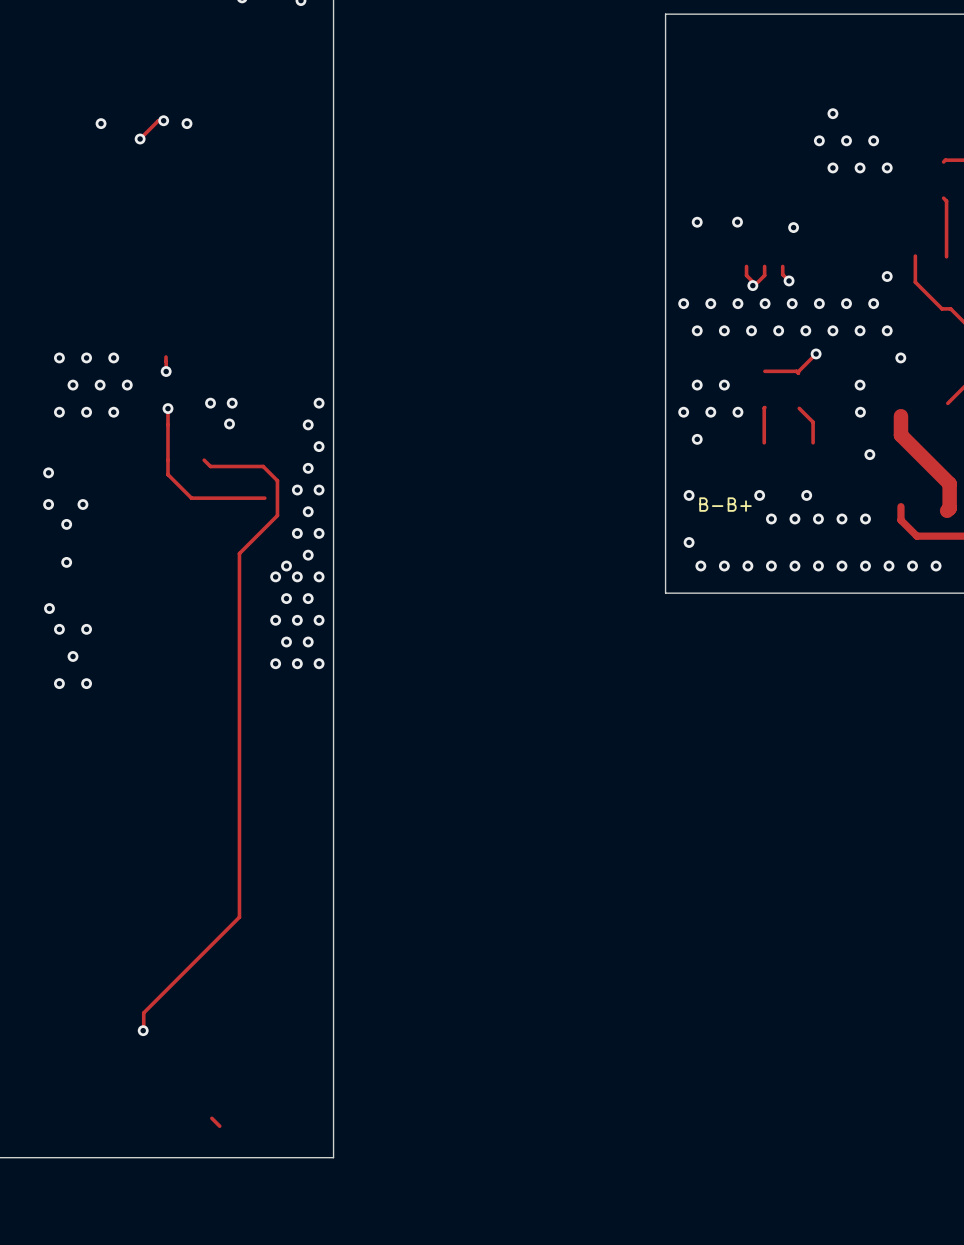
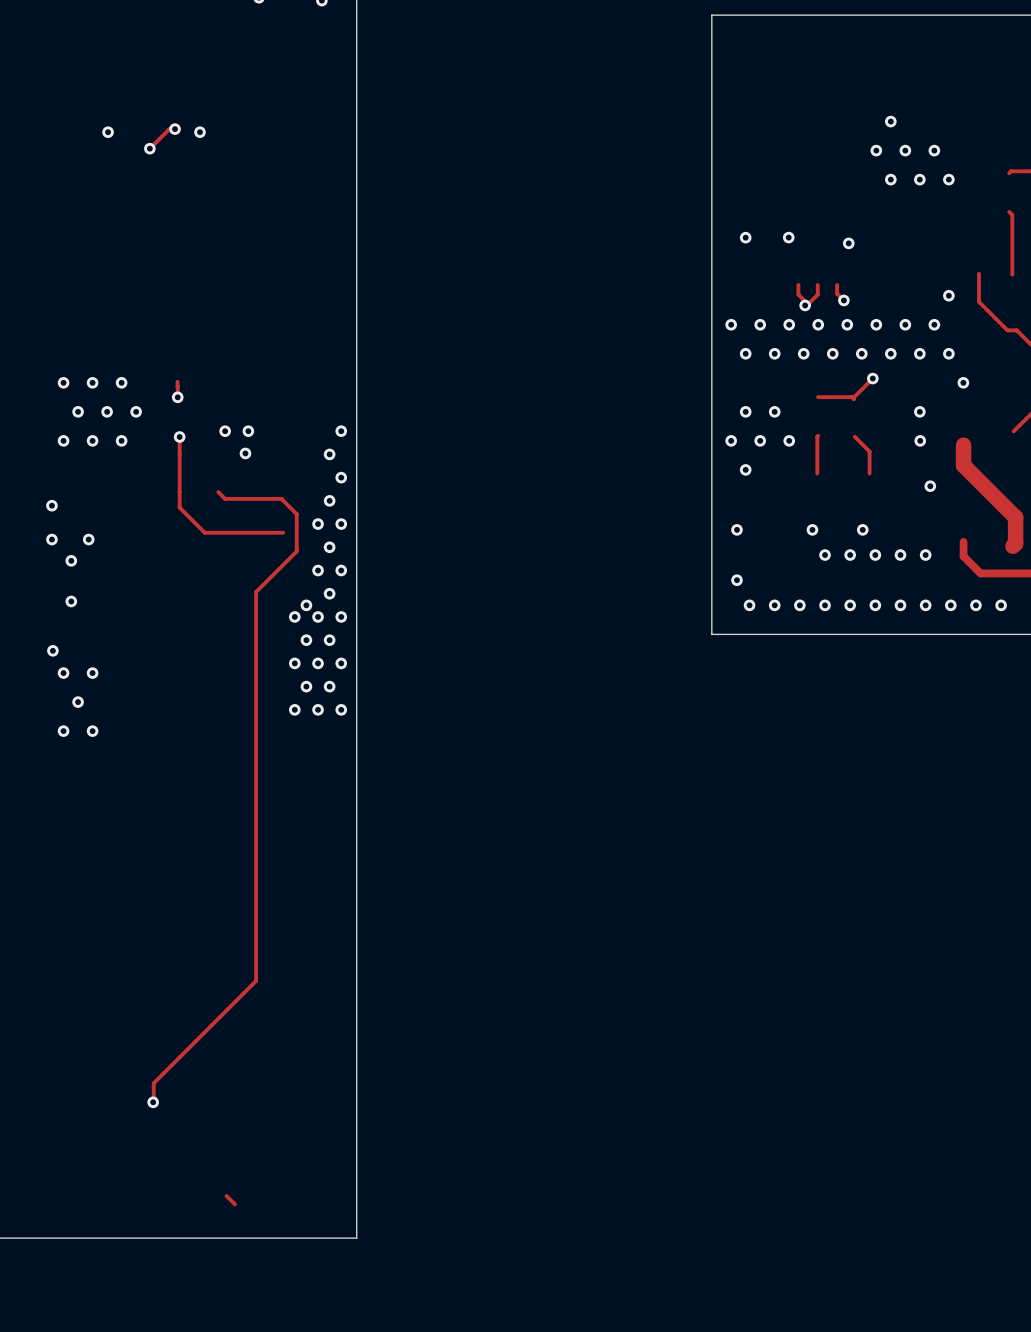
text: B-B+ (725, 504) -> none

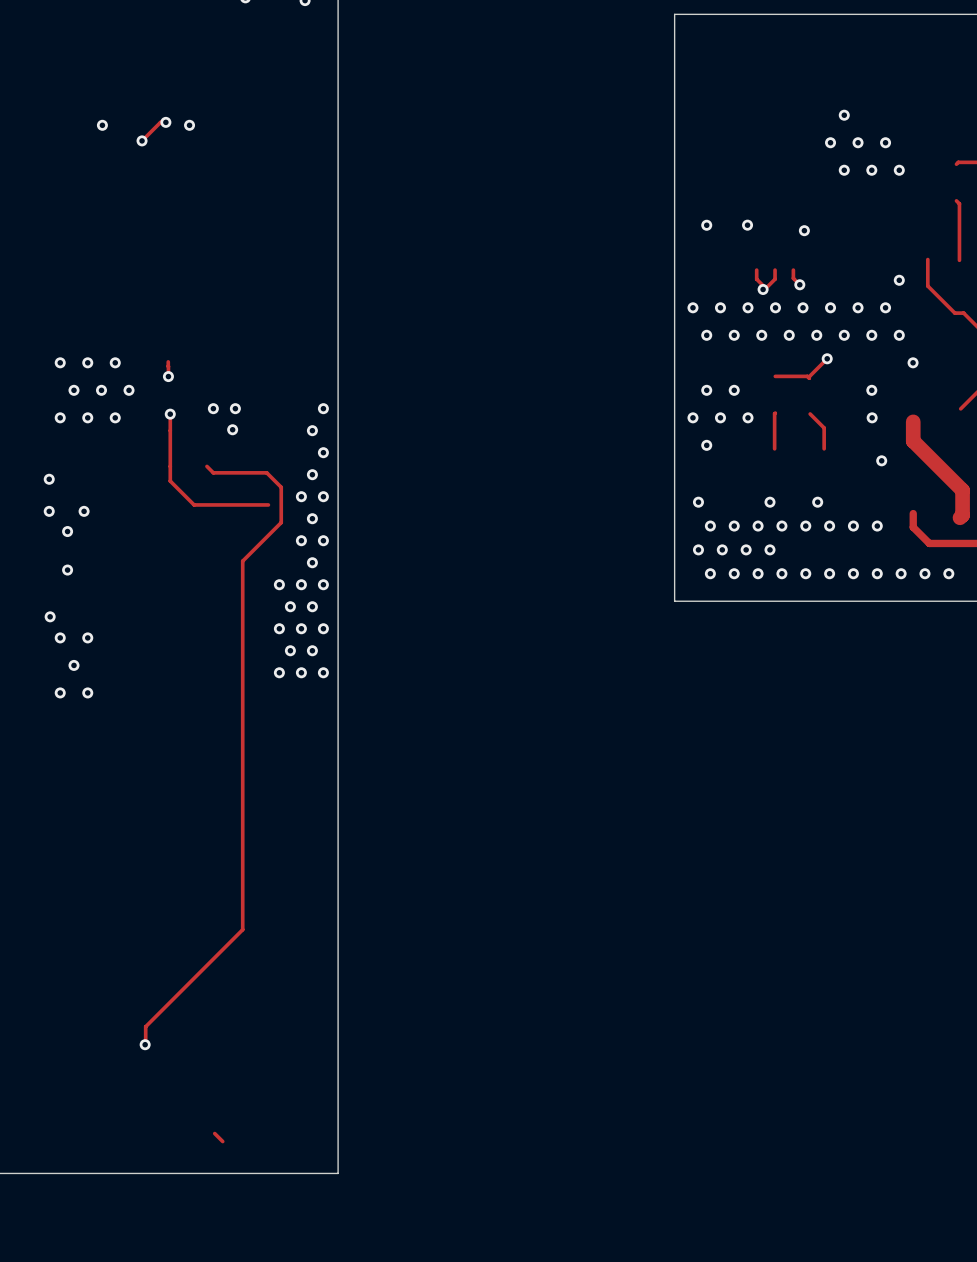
via: none -> (710, 526)
via: none -> (734, 526)
via: none -> (758, 526)
via: none -> (722, 549)
via: none -> (746, 549)
via: none -> (770, 549)
via: (306, 605) -> none

